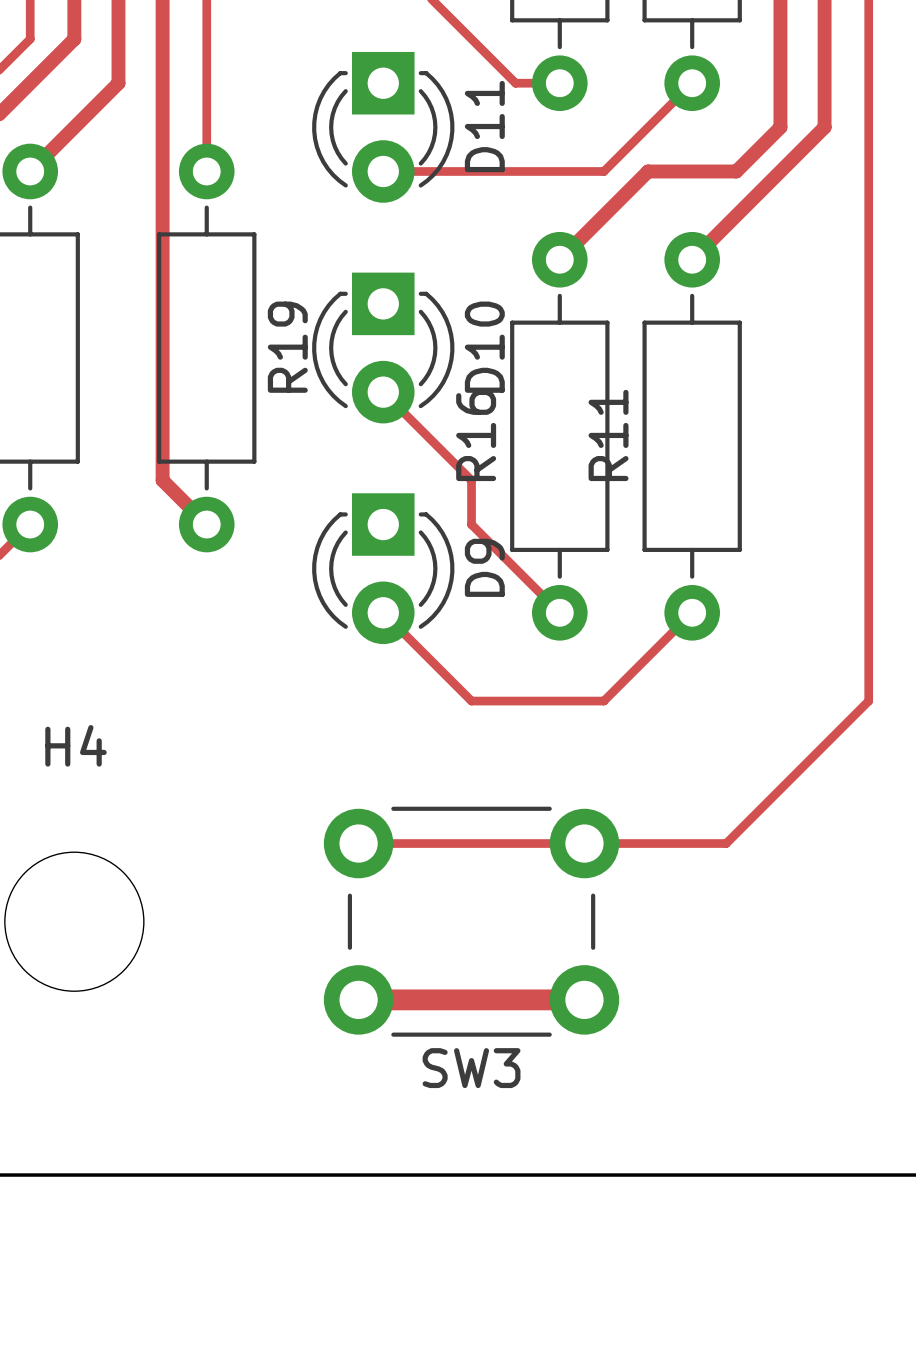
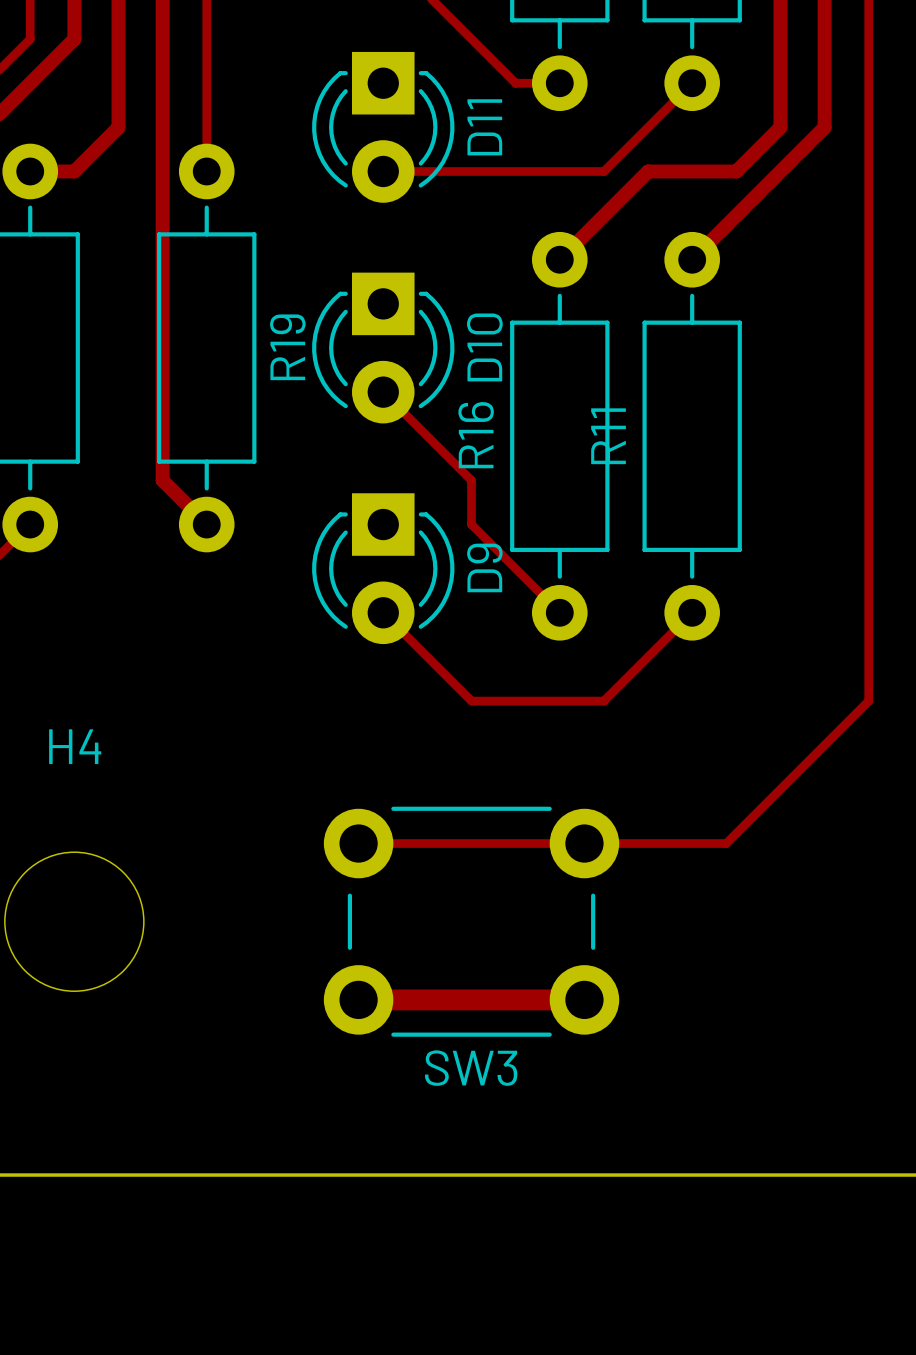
top track: (118, 83) (30, 171) -> (118, 83) (118, 127) (74, 171) (30, 171)

